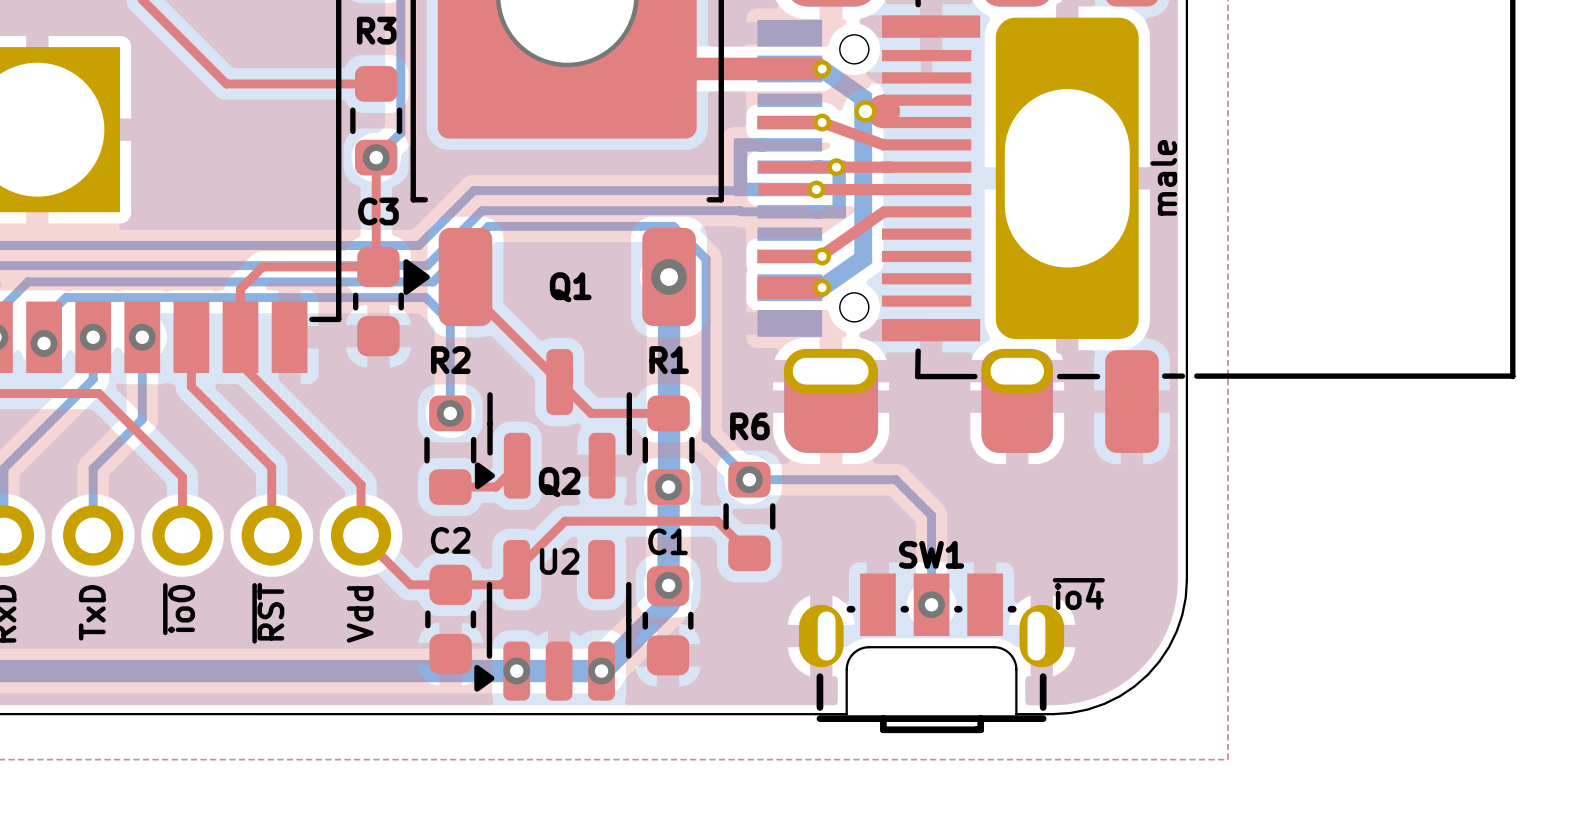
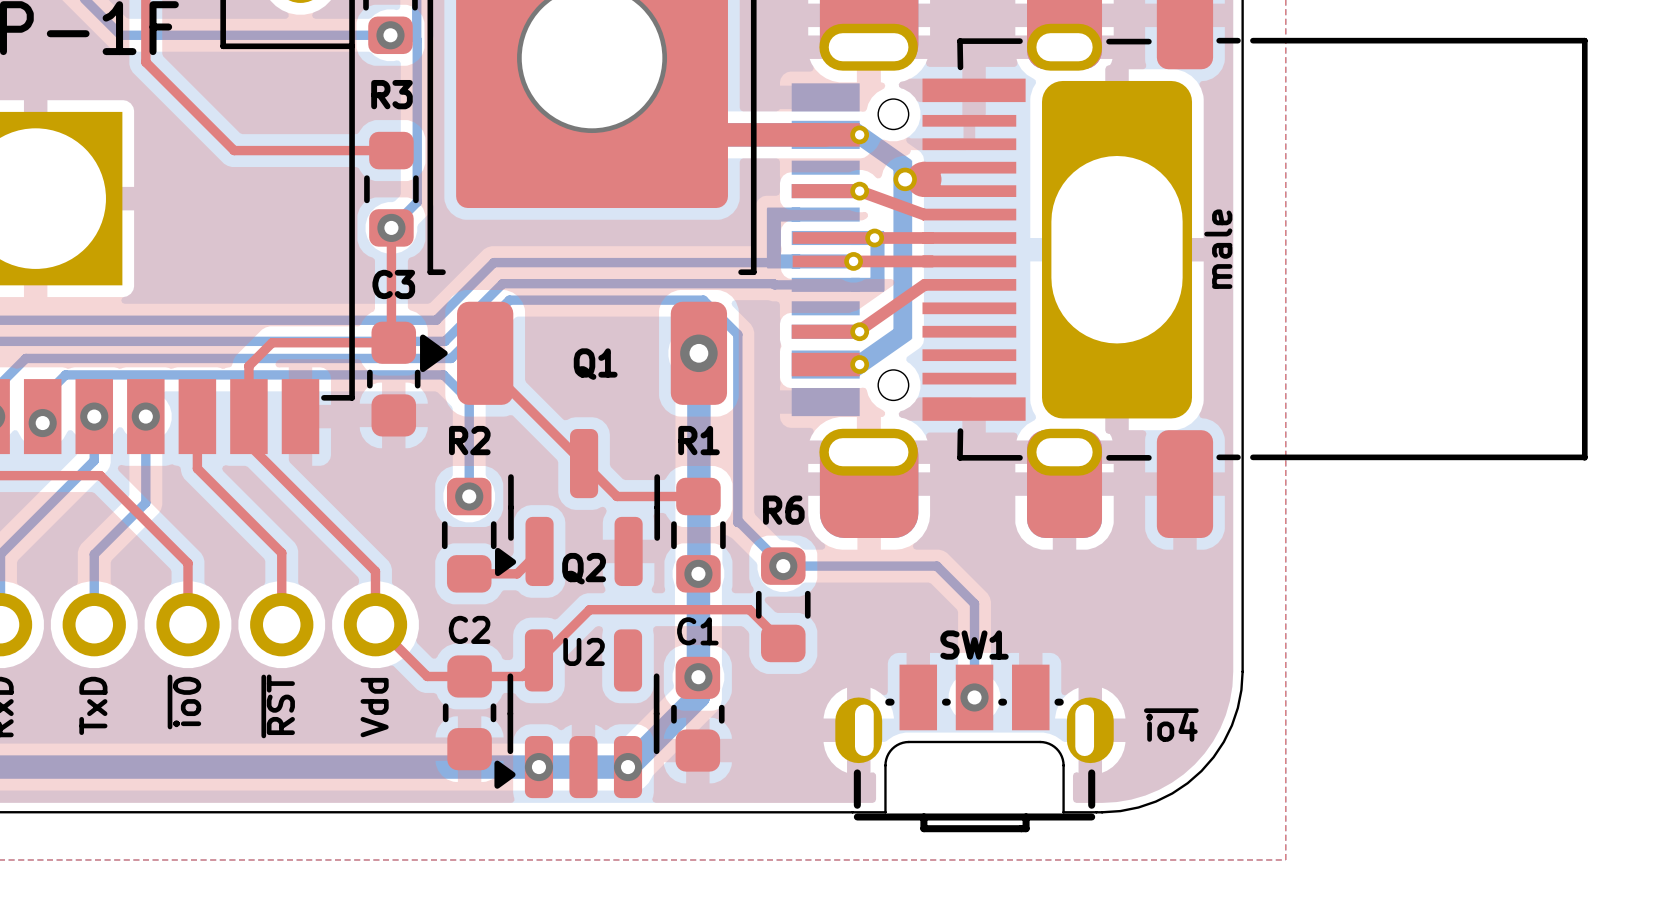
text position: ~{io4} (1078, 594) -> ~{io4} (1171, 725)

